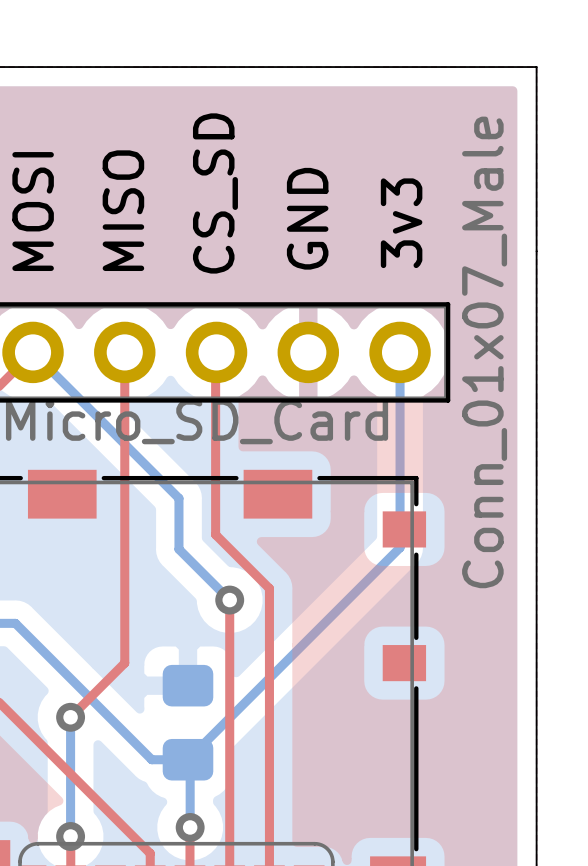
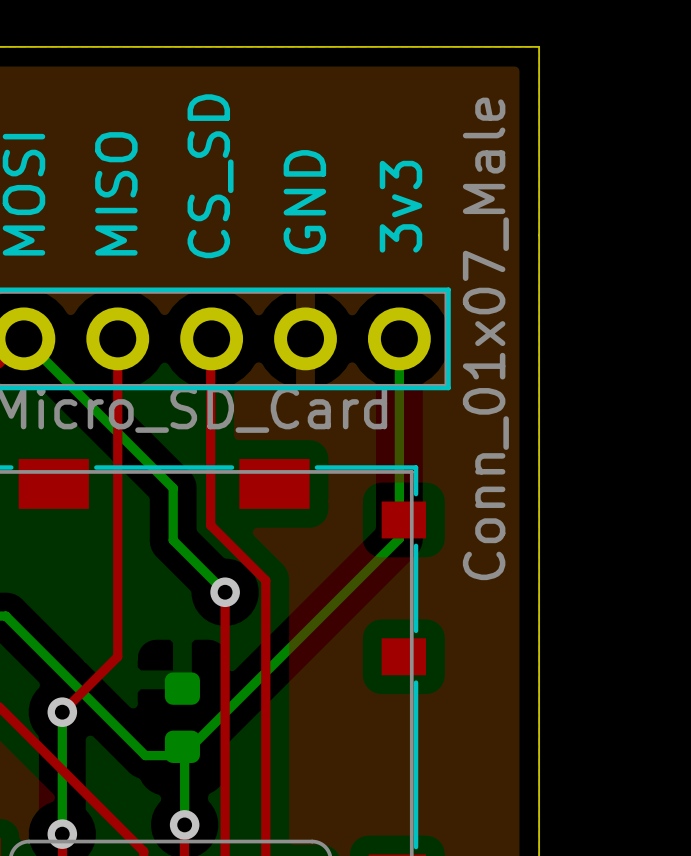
part footprint: [162, 664, 214, 781] -> [164, 672, 200, 763]

